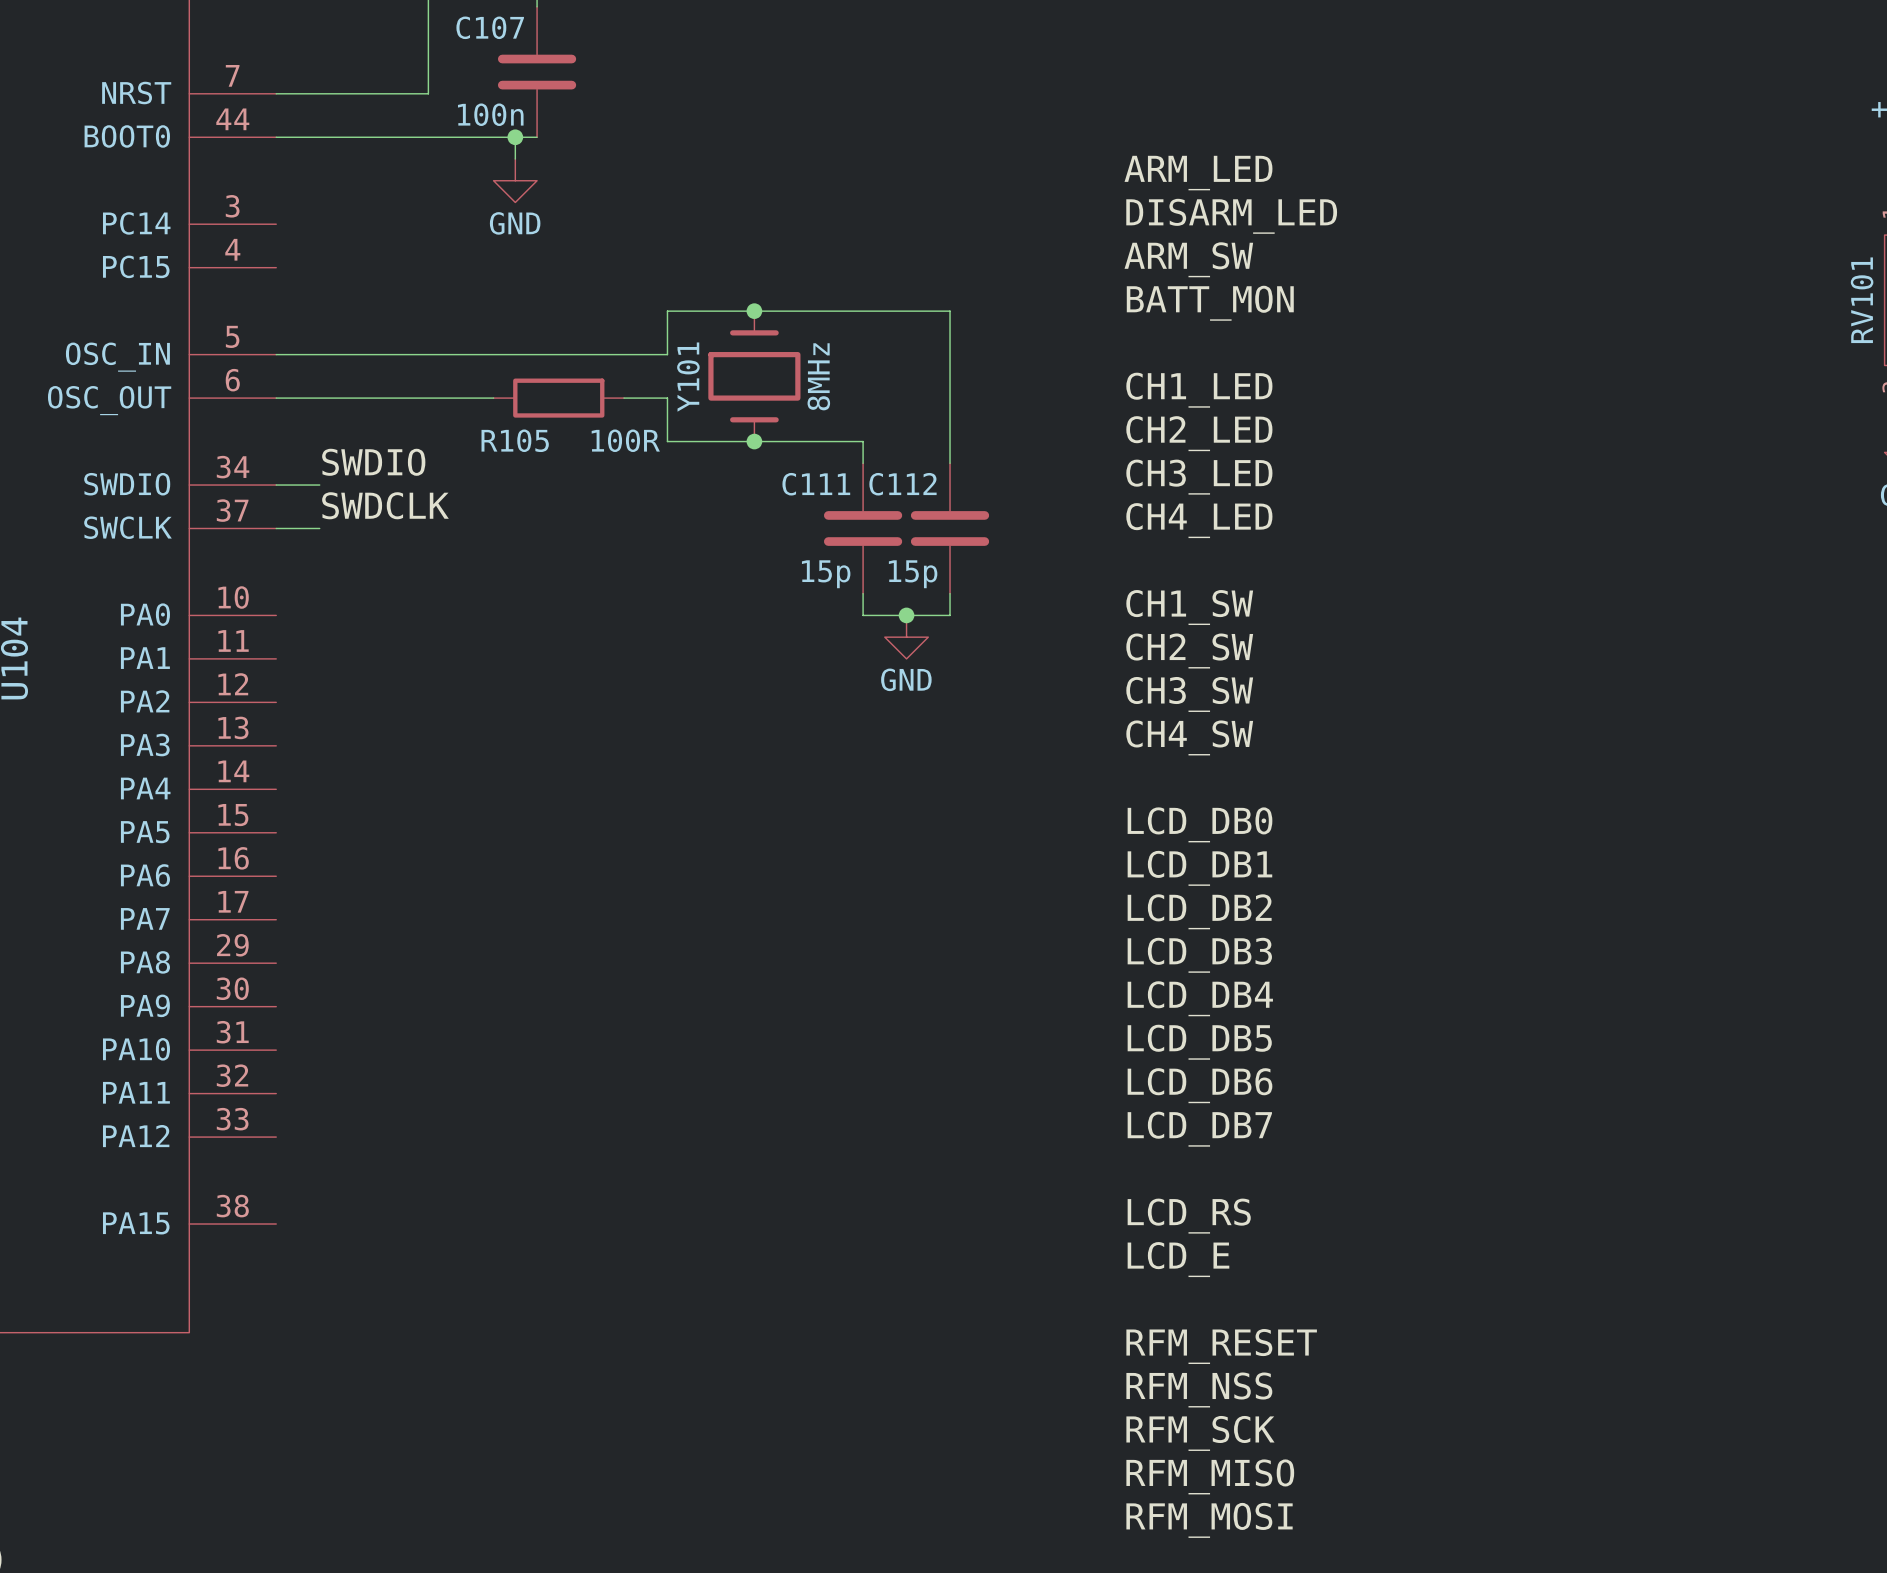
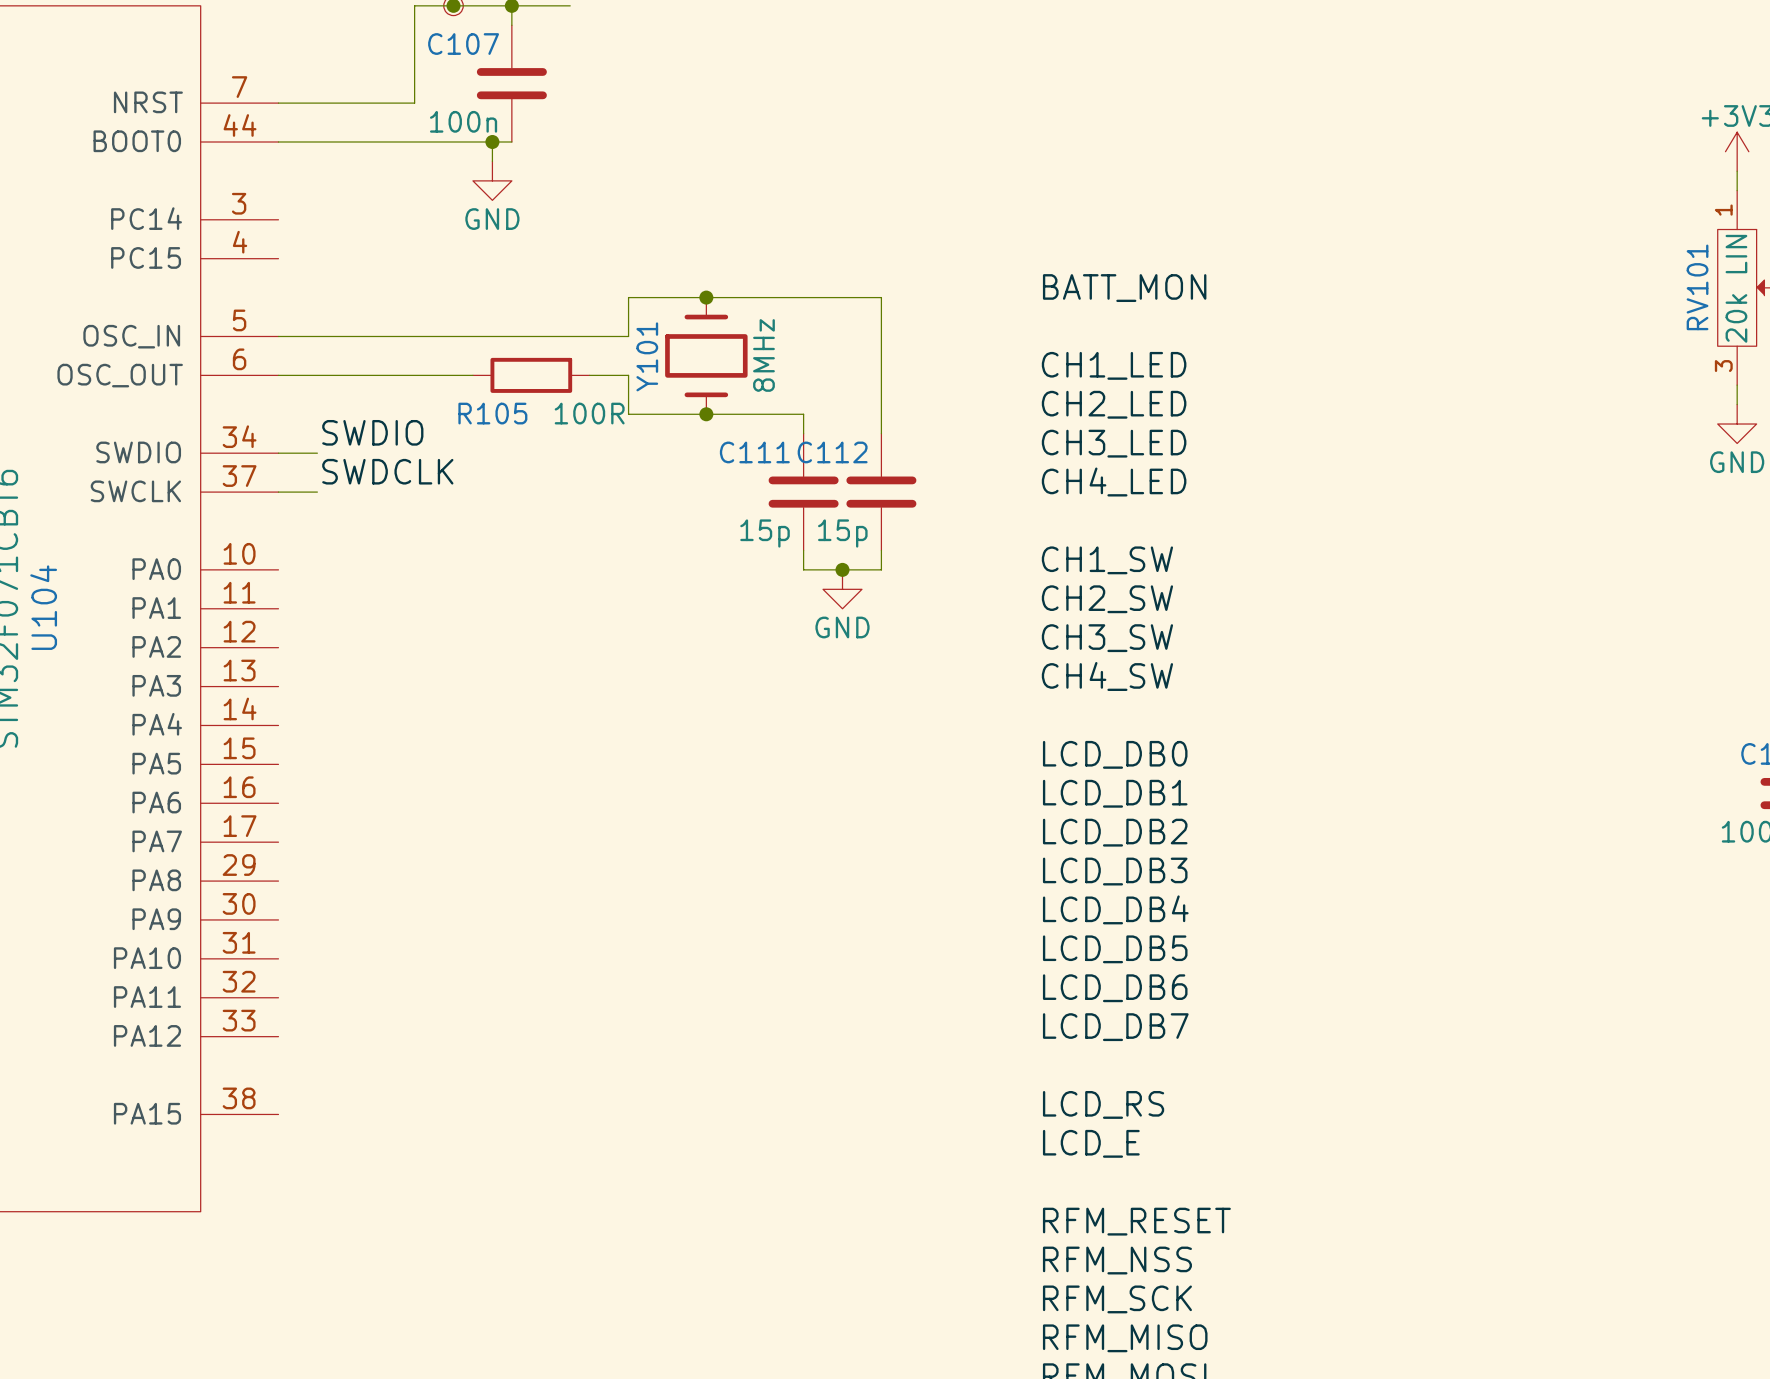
label: ARM_LED (1198, 173) -> none
label: DISARM_LED (1231, 216) -> none
label: ARM_SW (1188, 259) -> none

